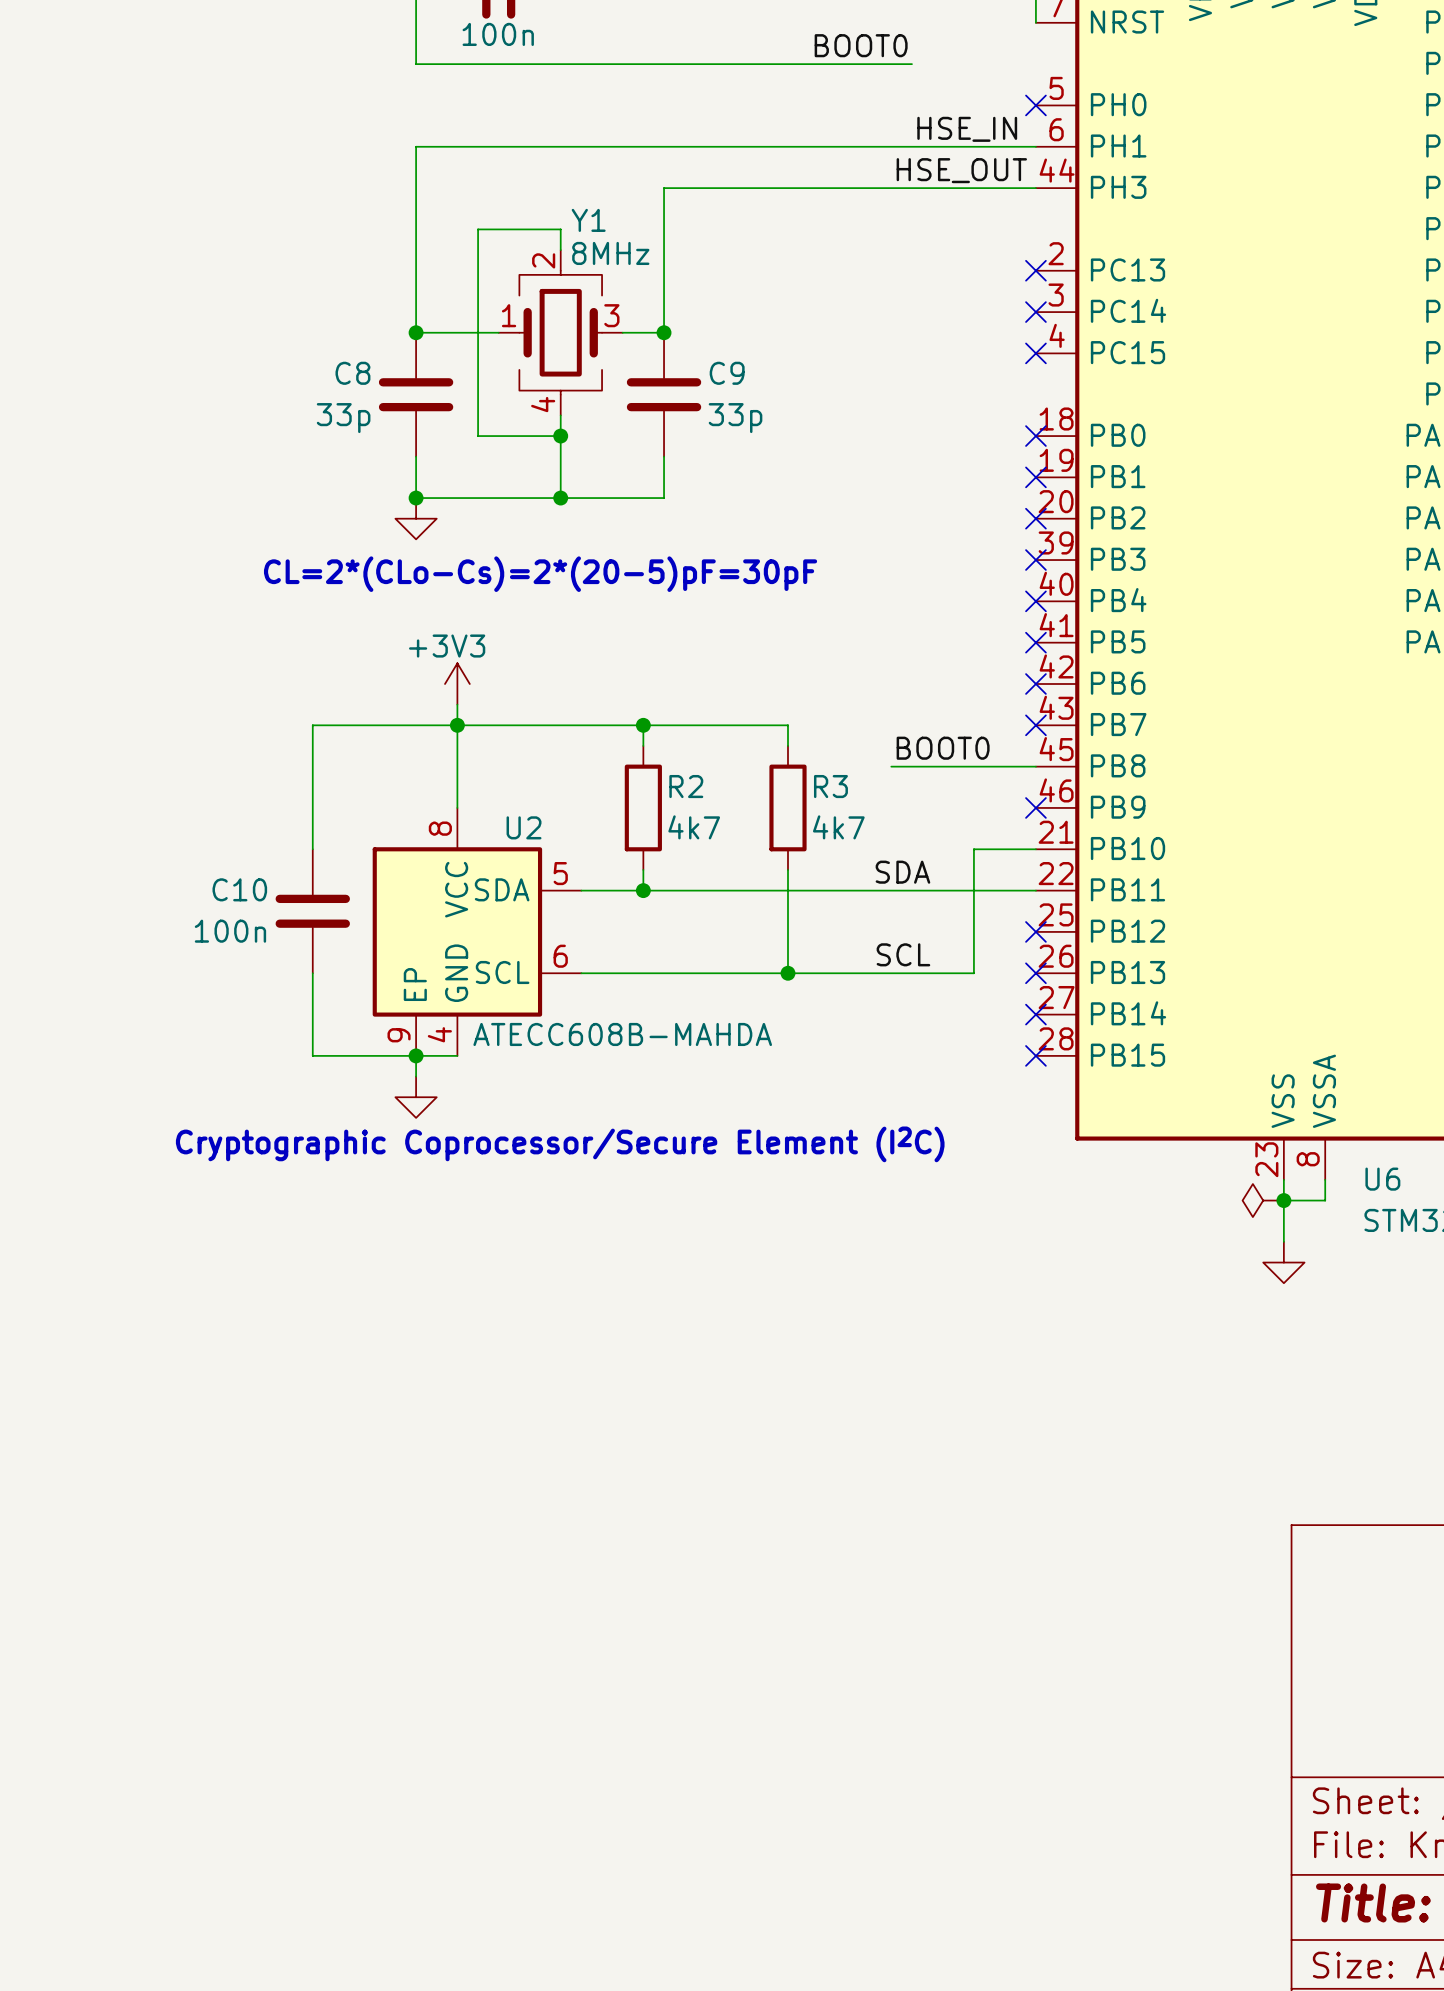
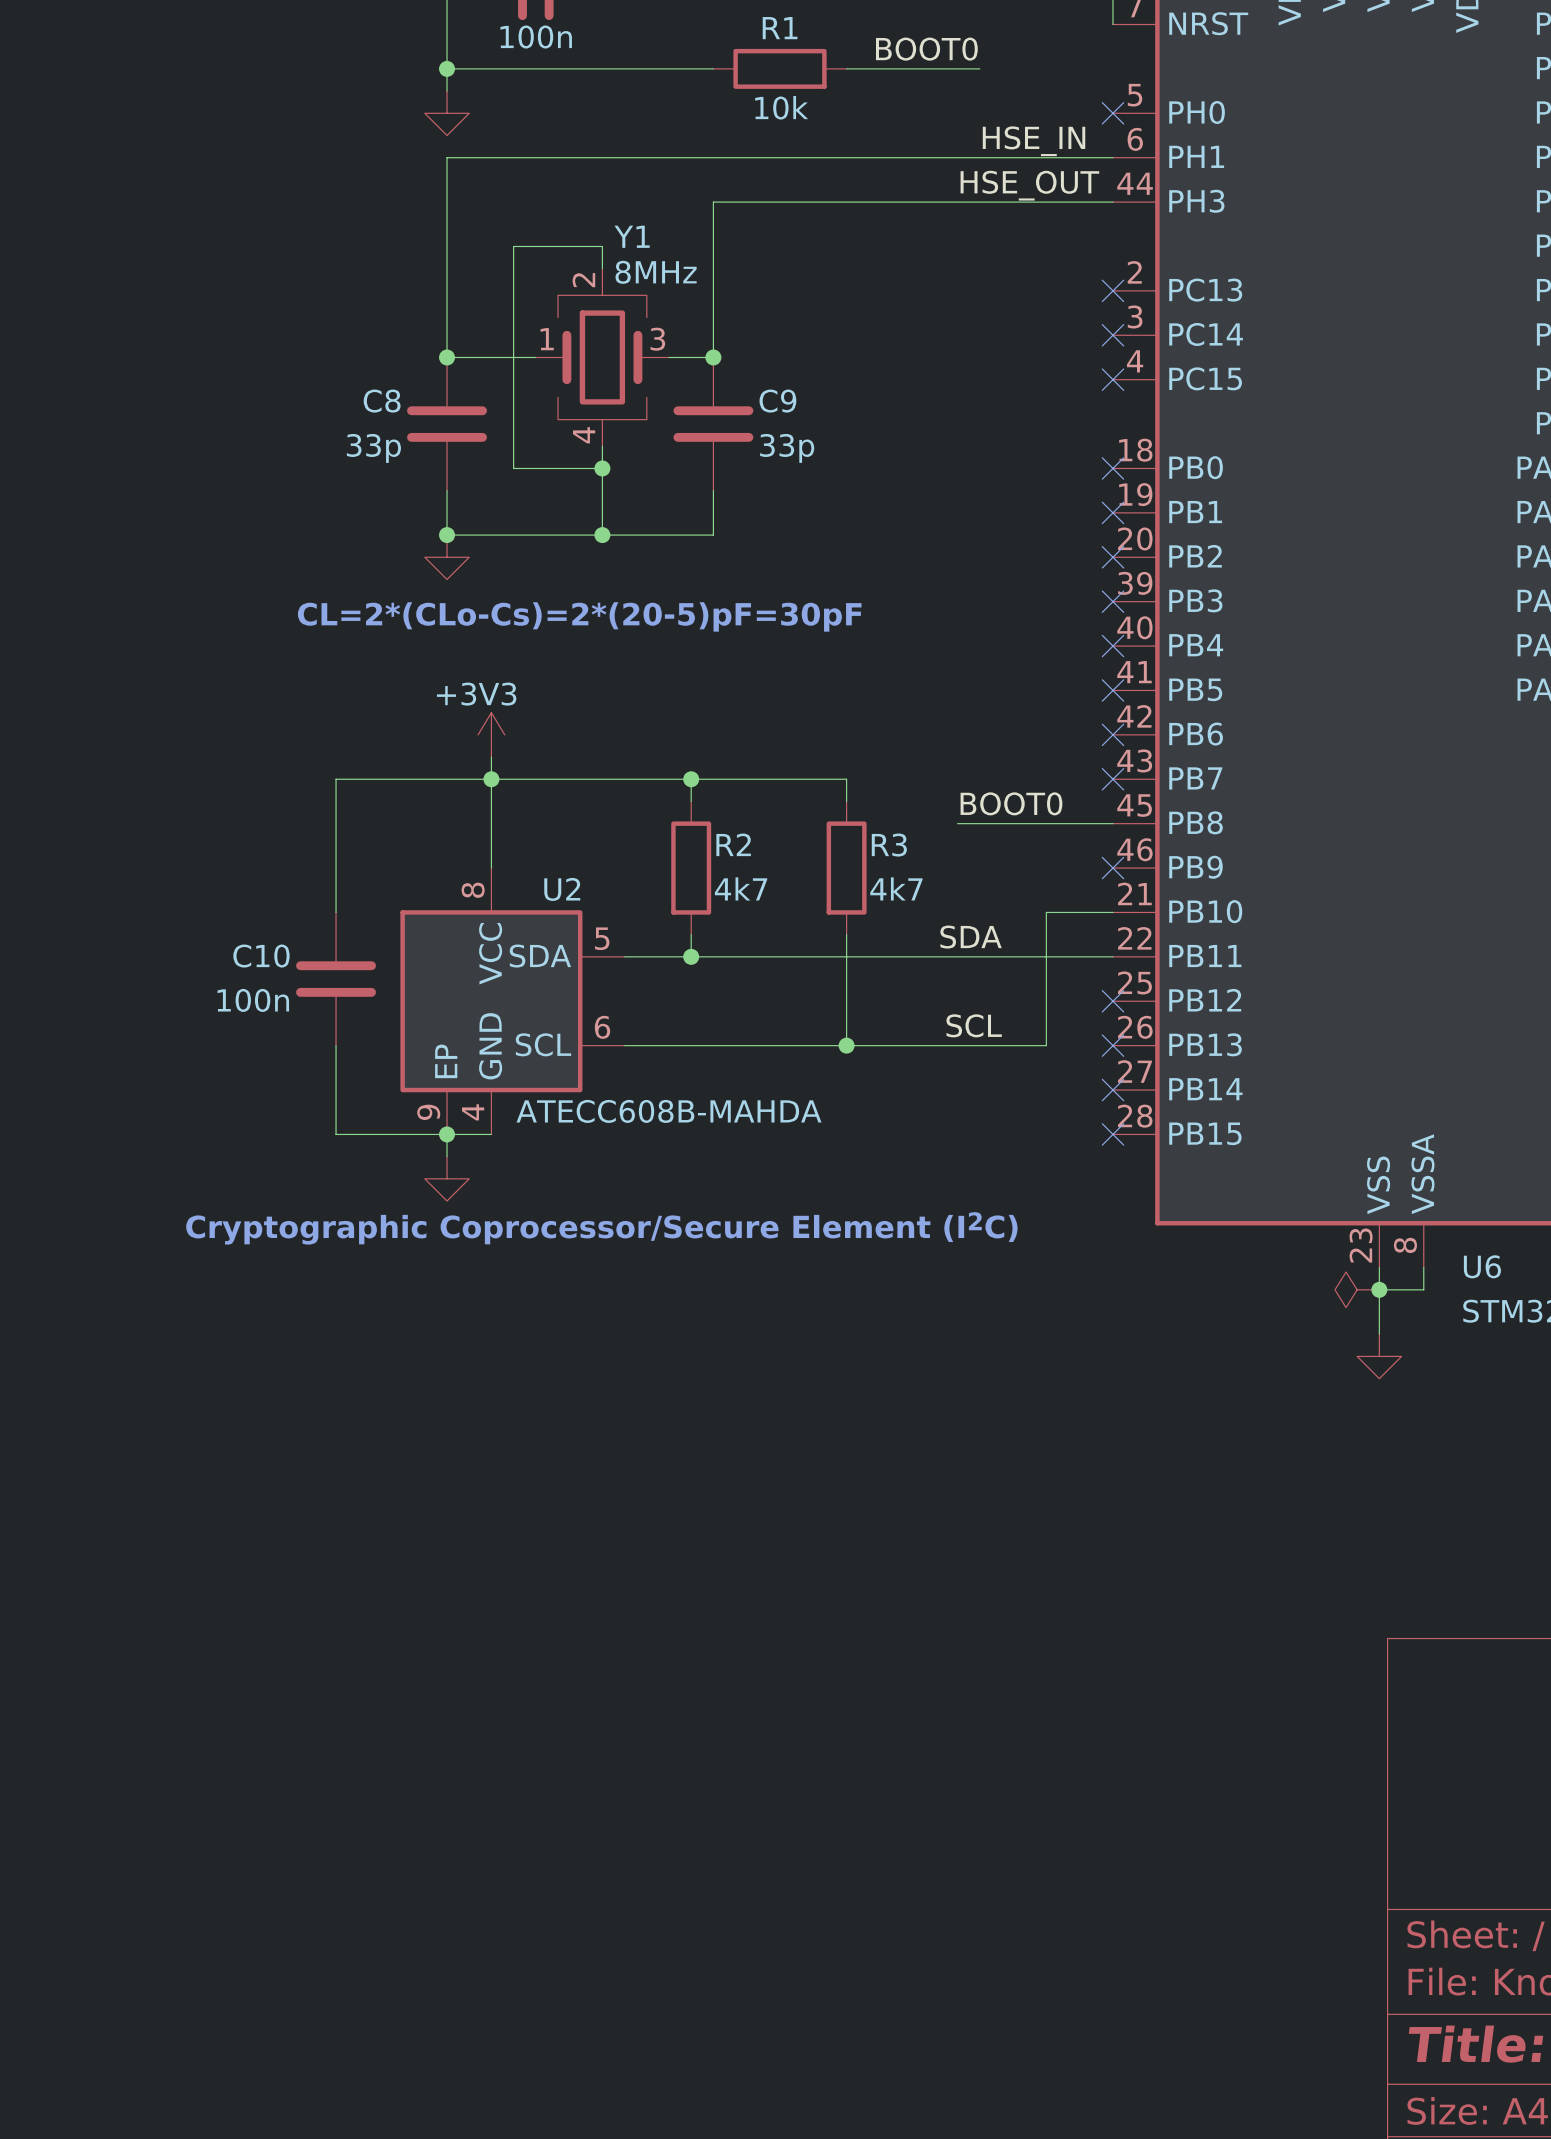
wire: none -> (447, 68) (447, 91)
junction: none -> (447, 68)
wire: (664, 64) (788, 64) -> none
R1: none -> 10k (780, 68)
power symbol: none -> (447, 113)

